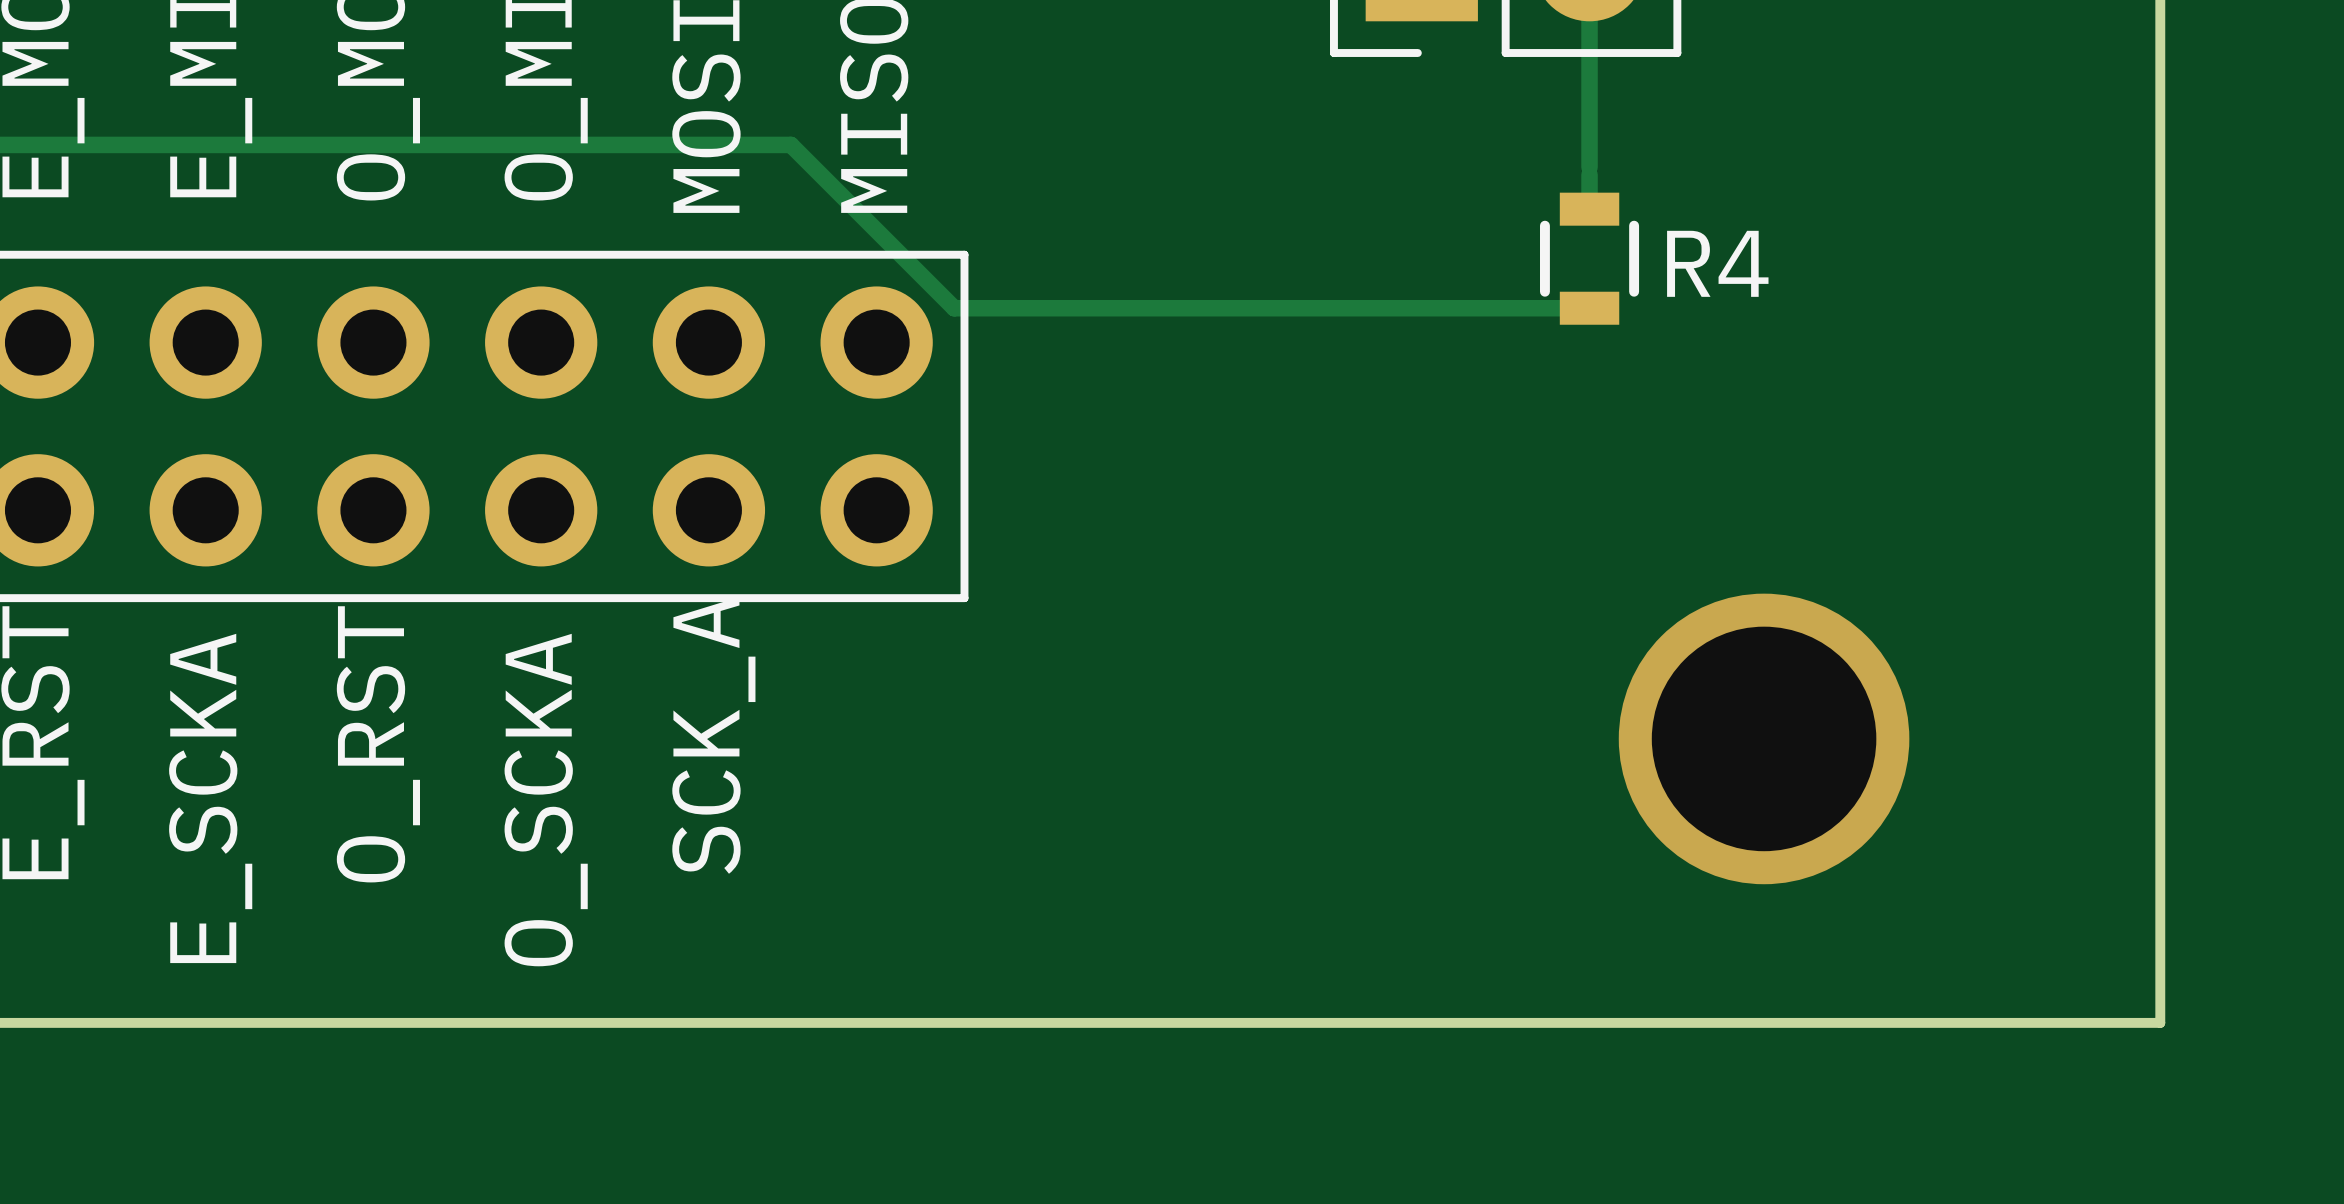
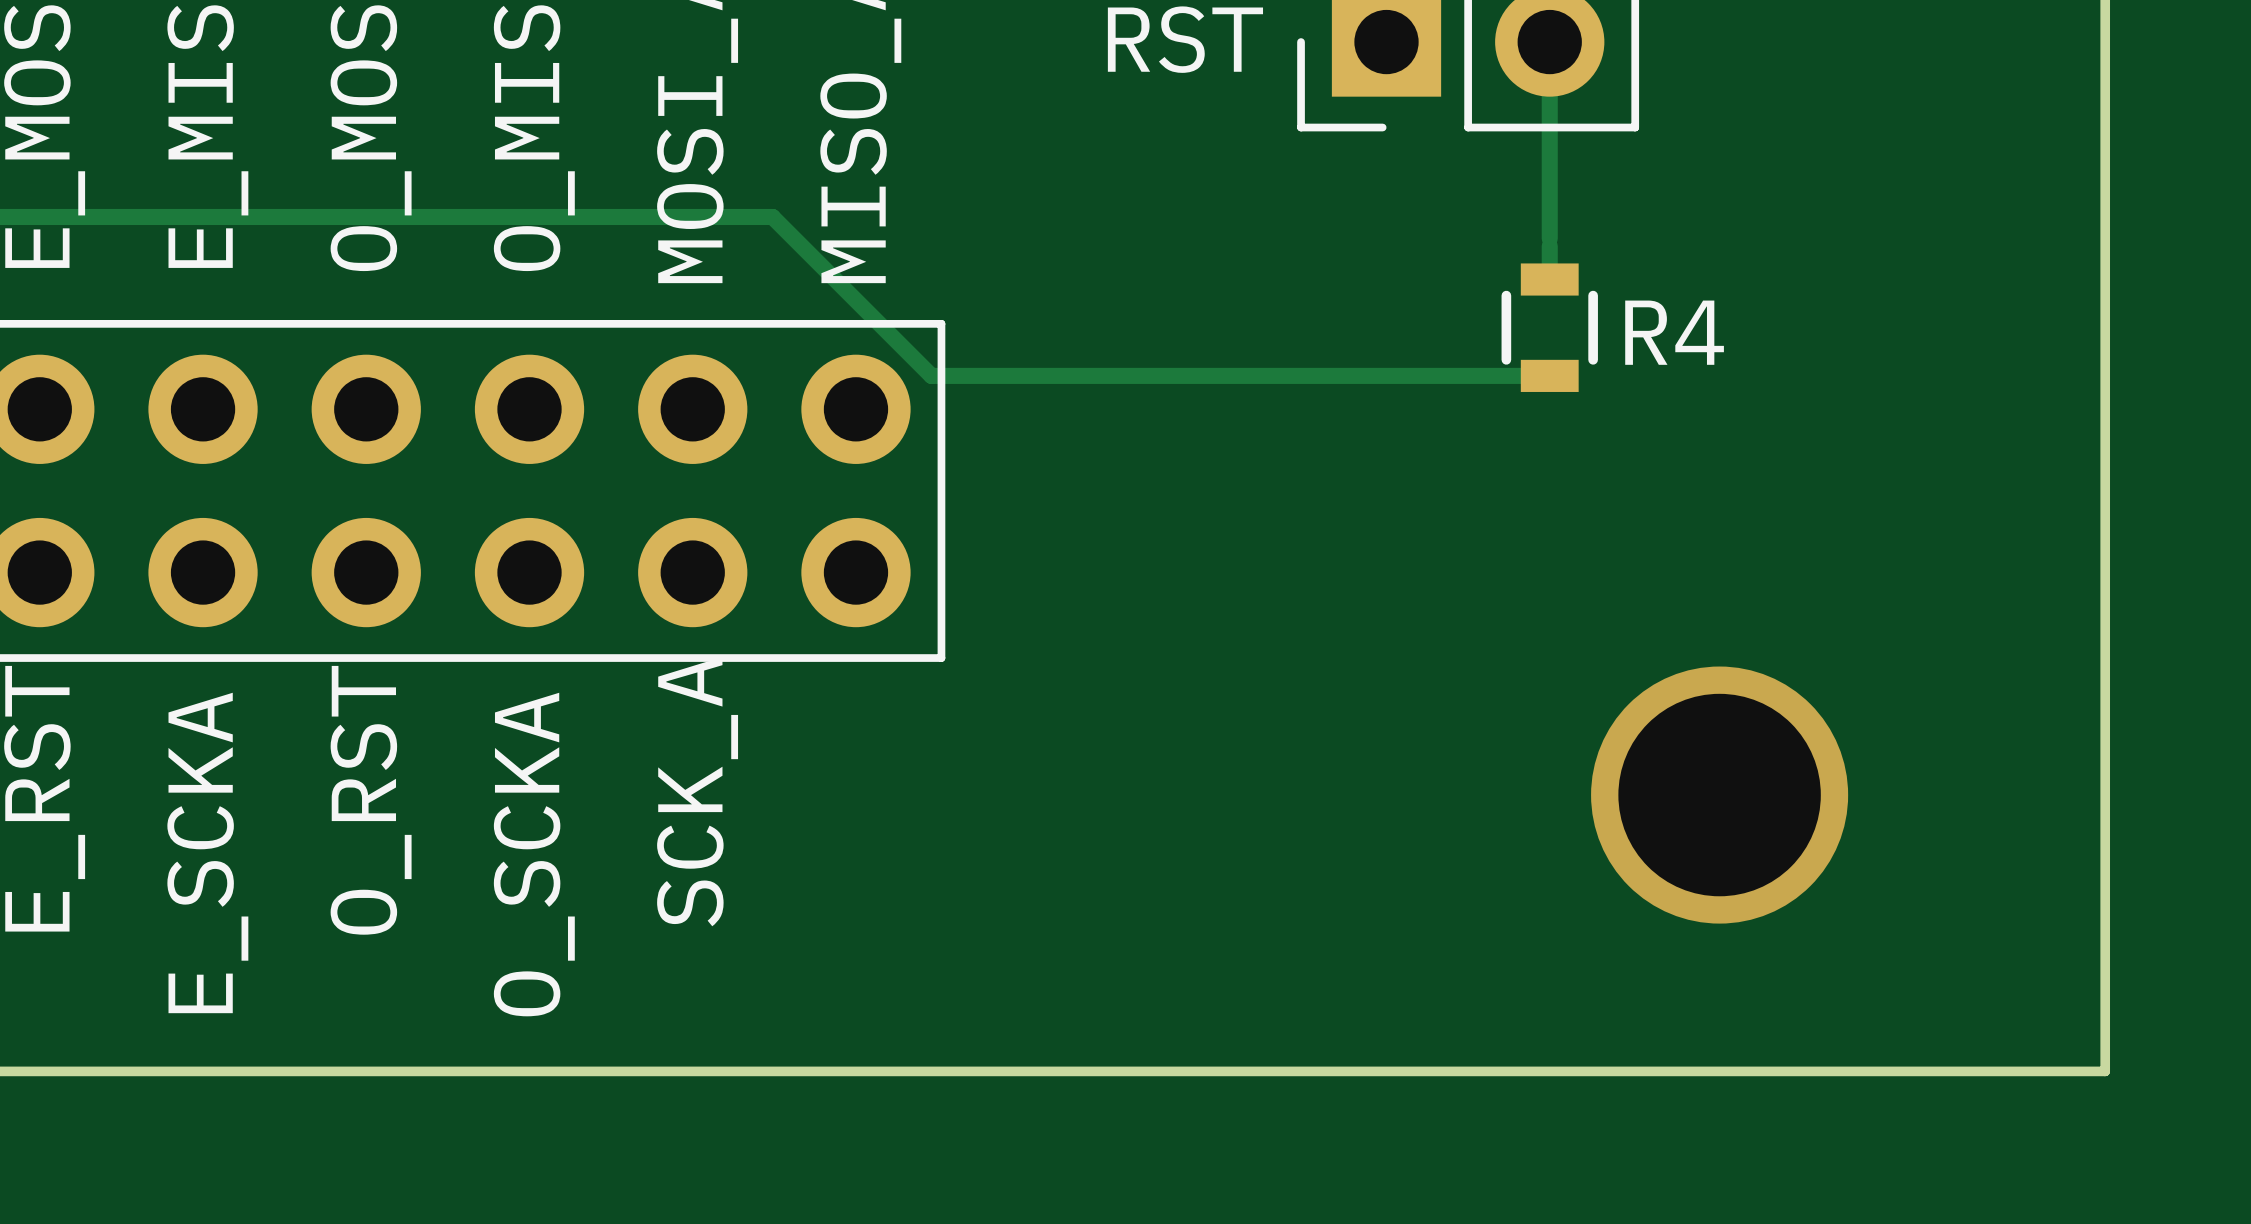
via size: [1618, 593, 1910, 885] -> [1591, 666, 1849, 924]

